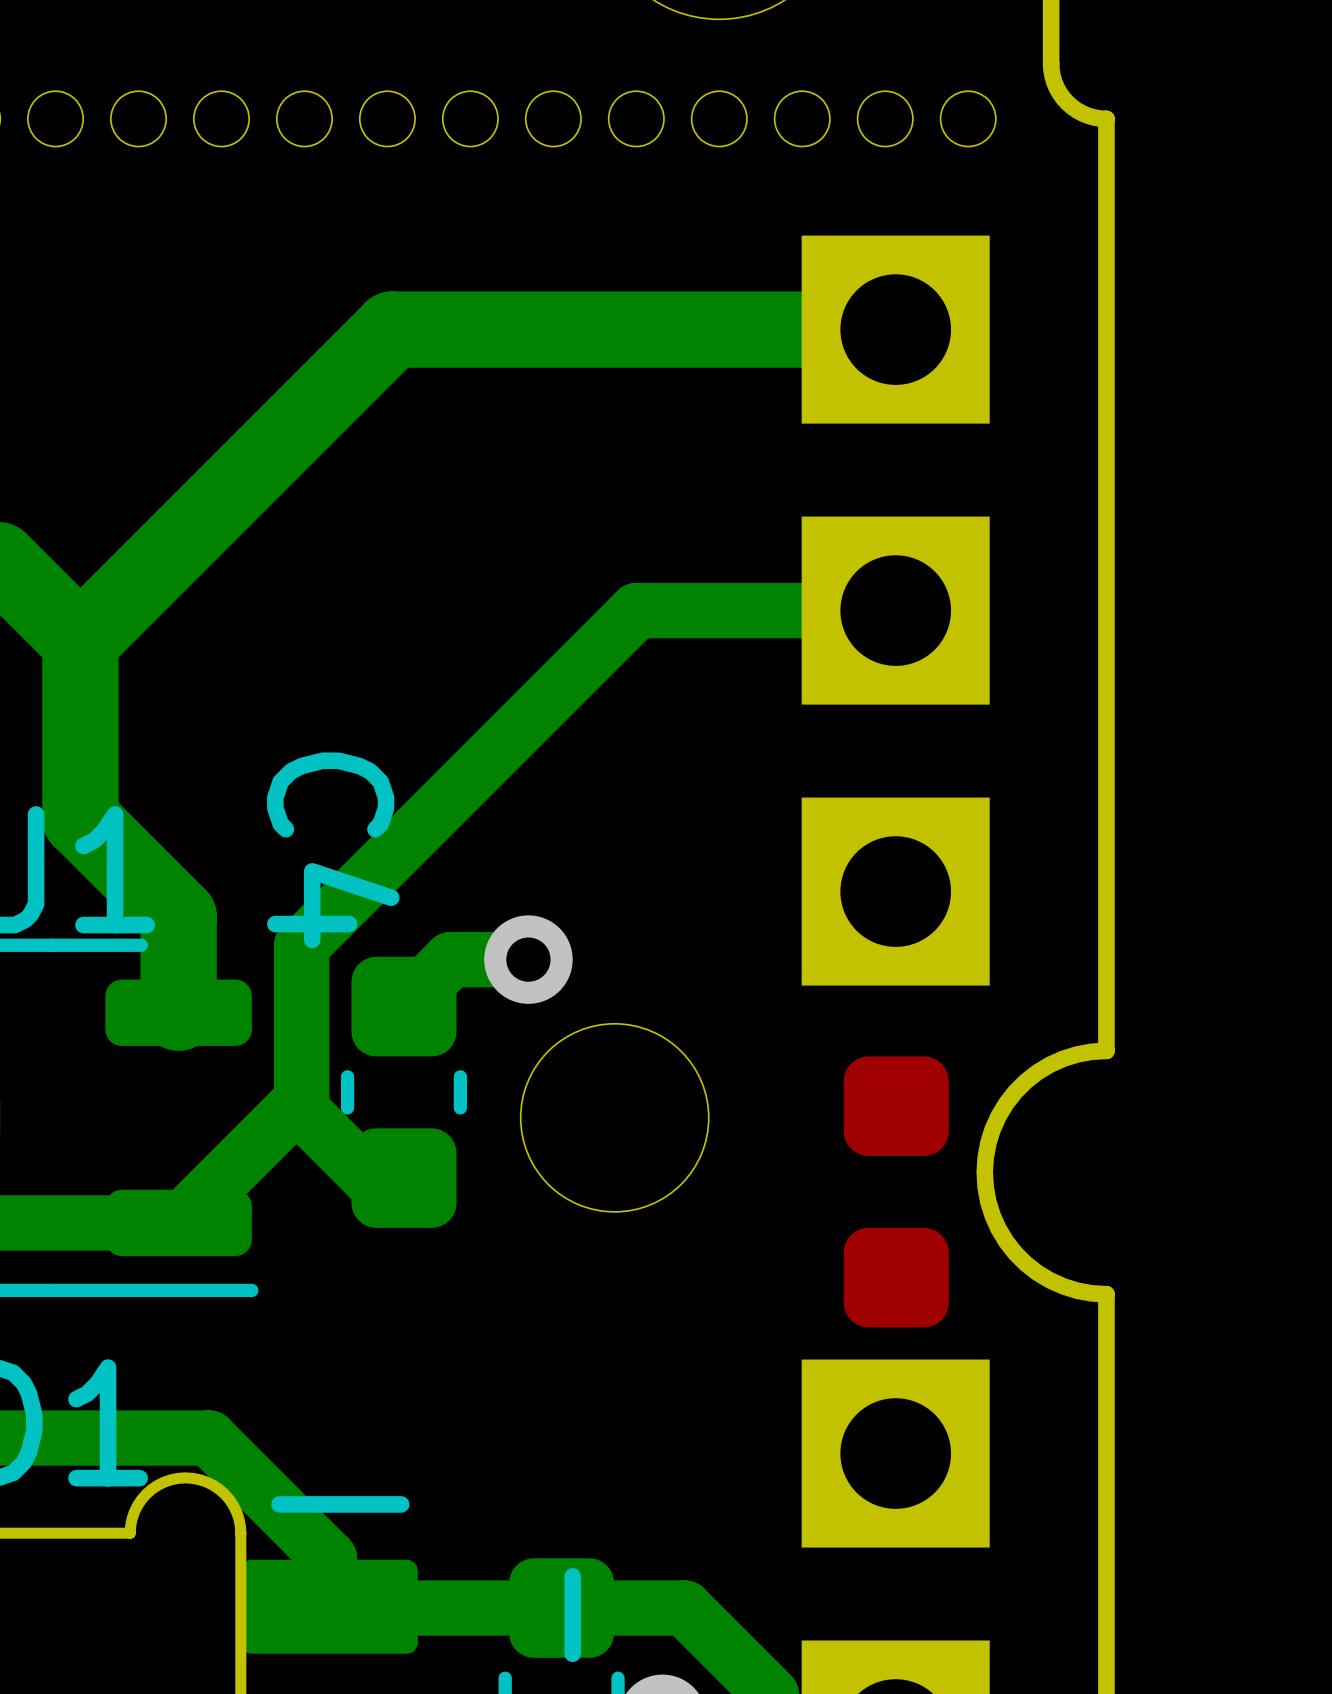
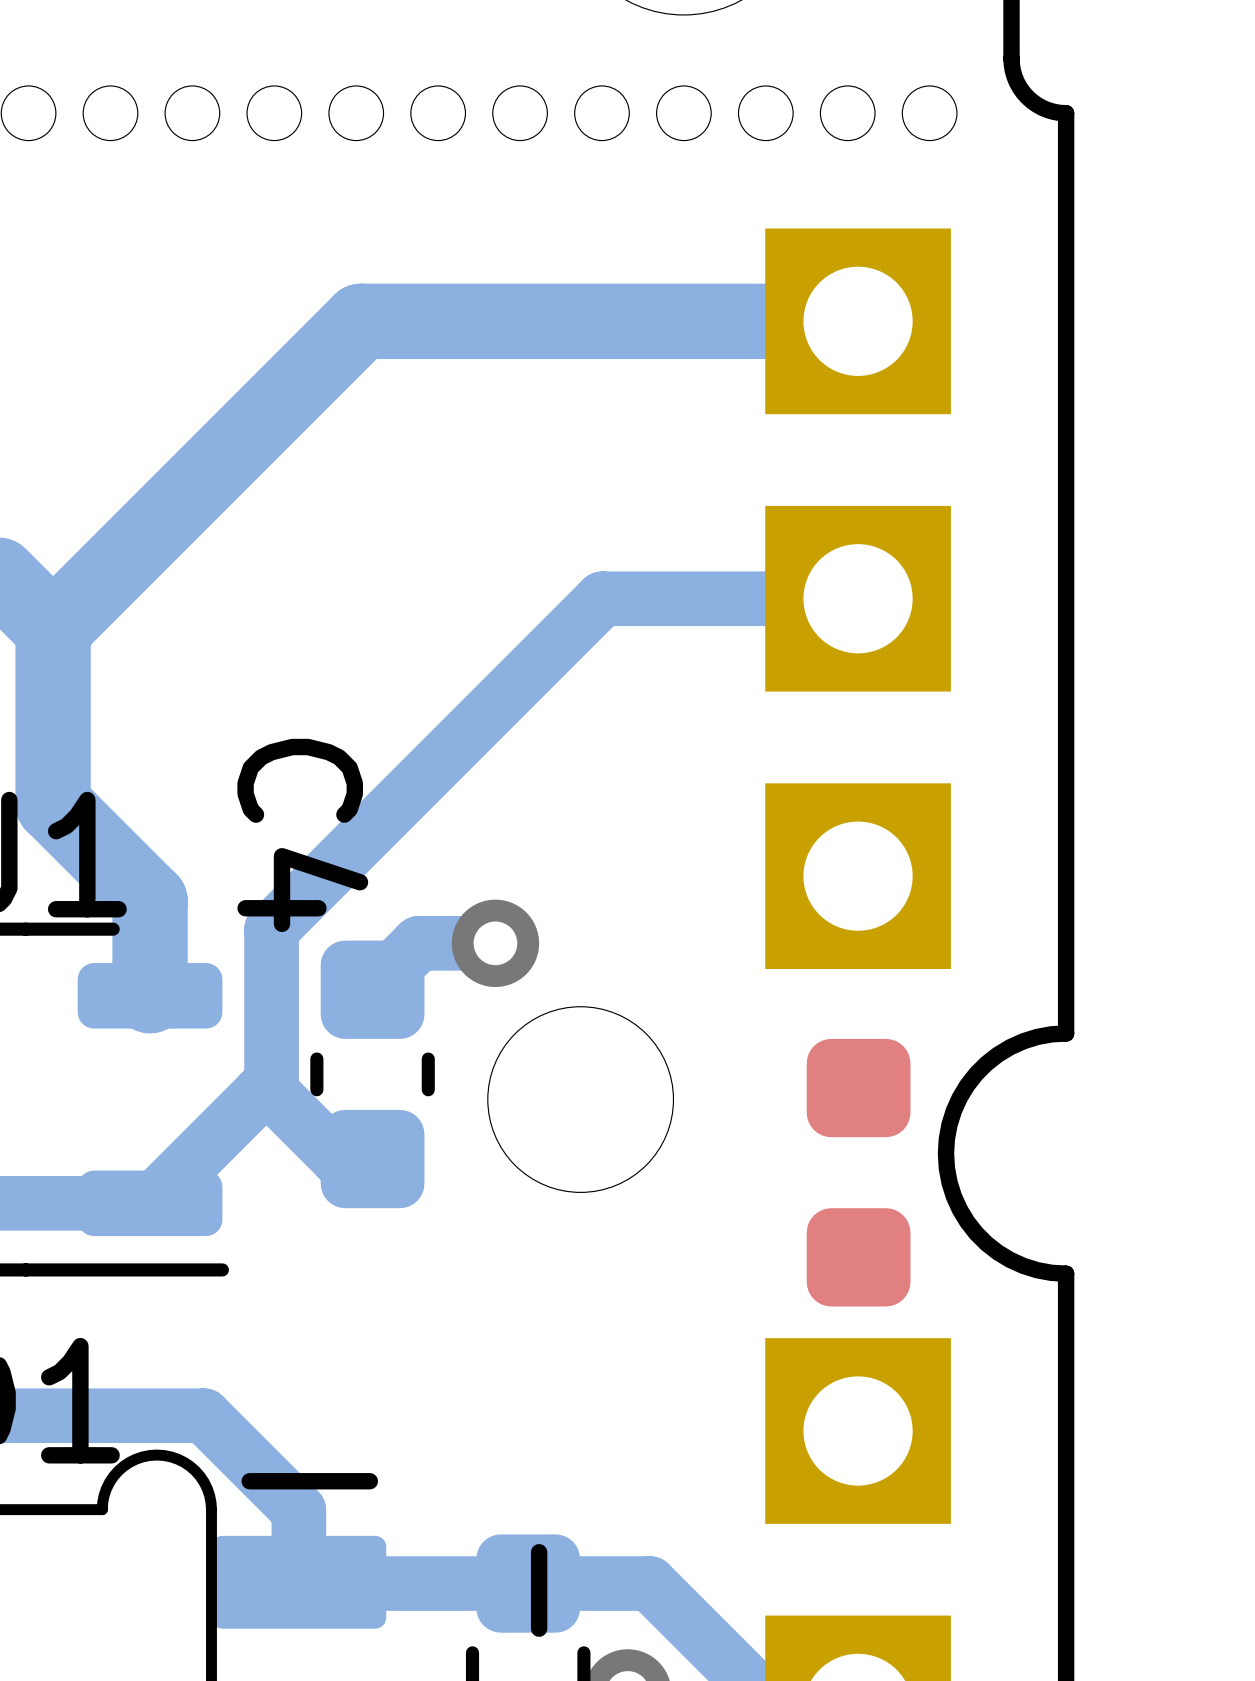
bottom track: (208, 1438) (329, 1558) -> (180, 1415) (203, 1415) (298, 1510) (298, 1534)

